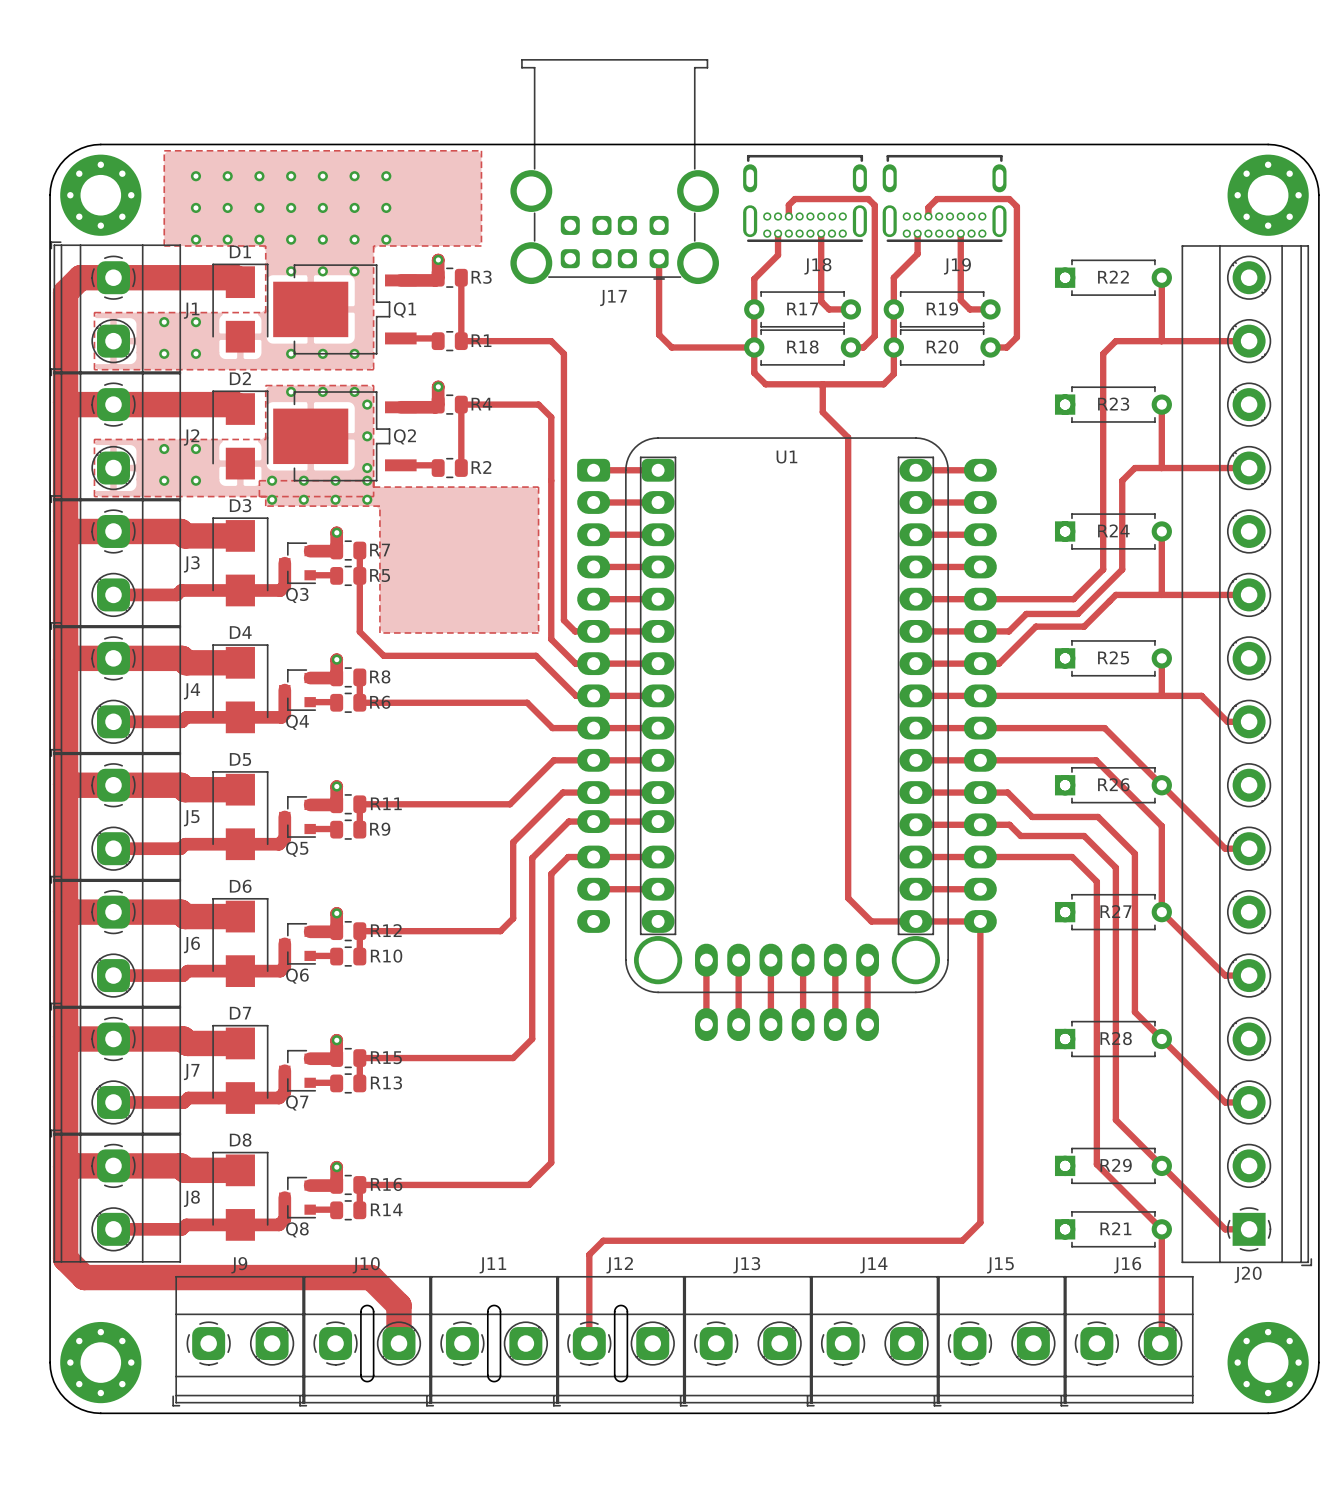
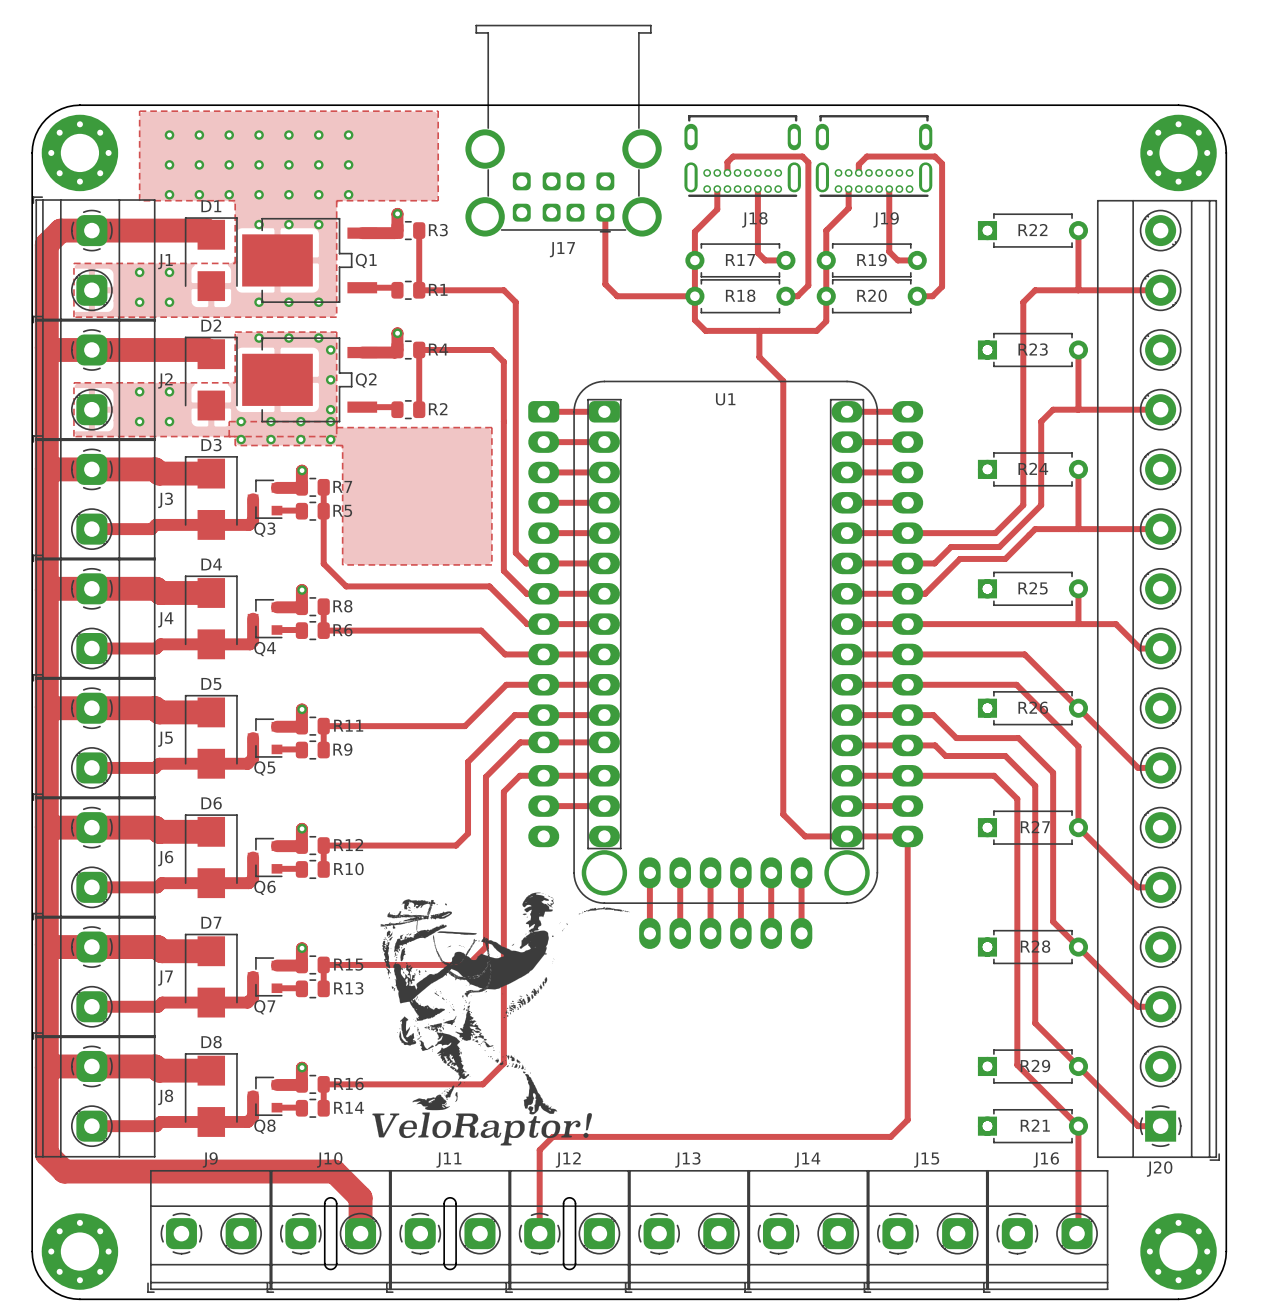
drawing: none -> [372, 892, 630, 1146]

